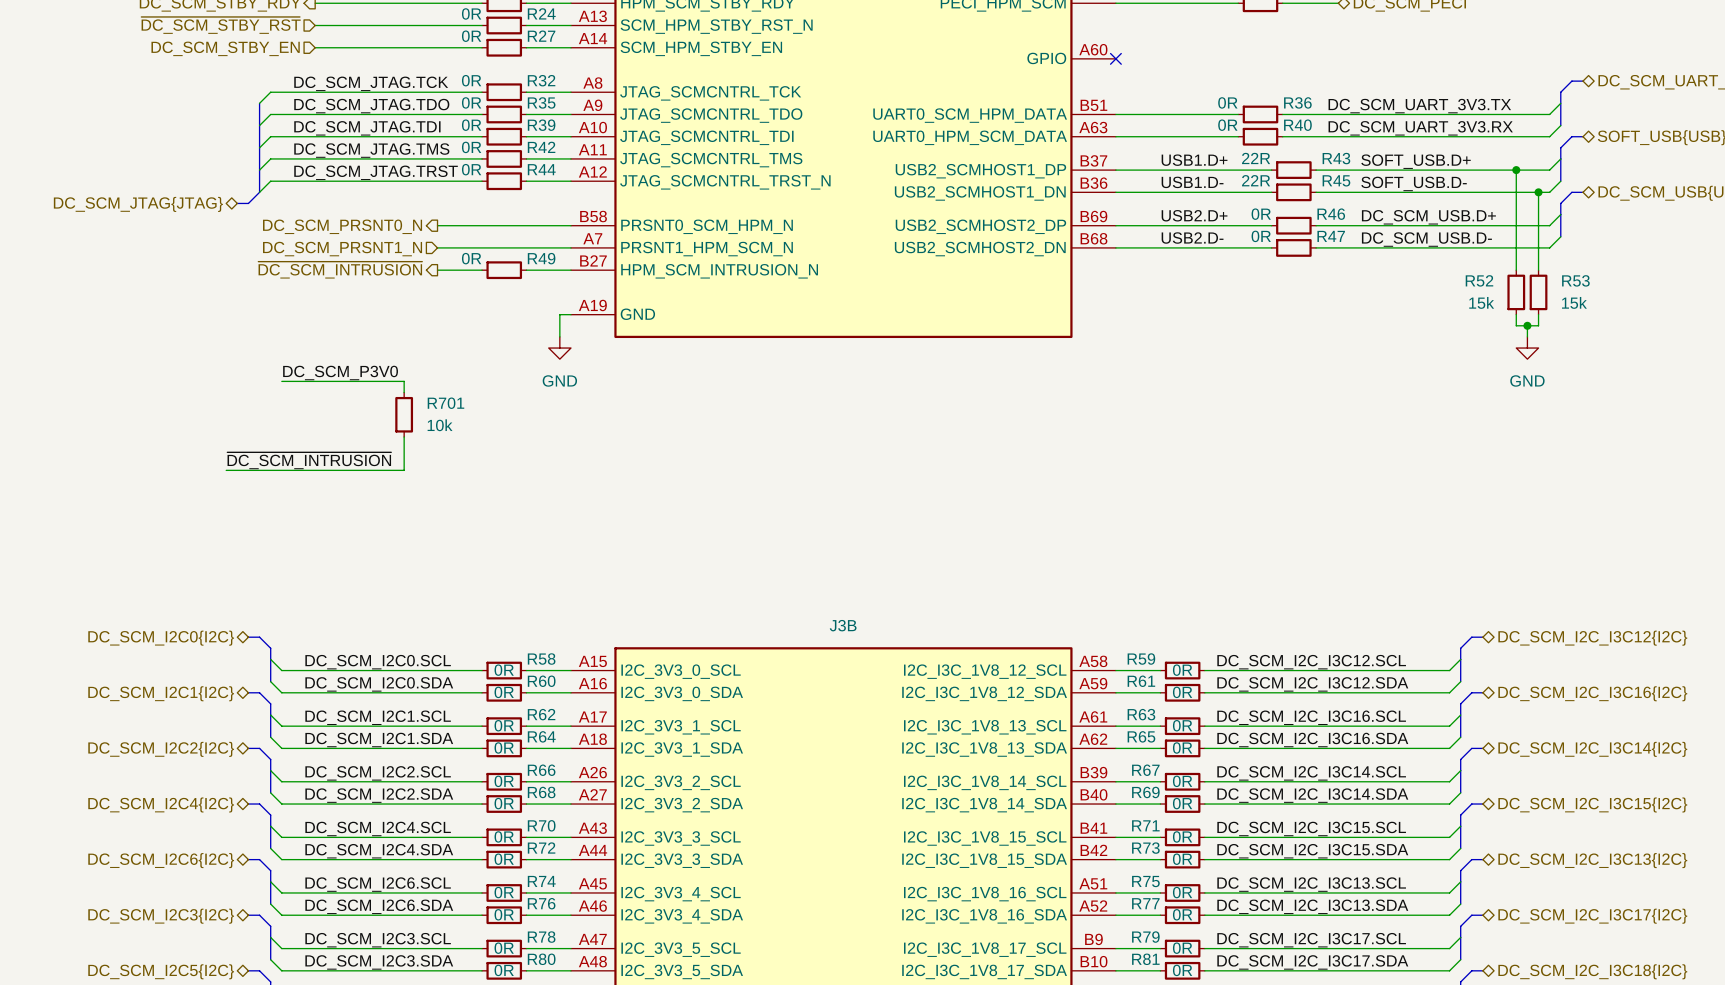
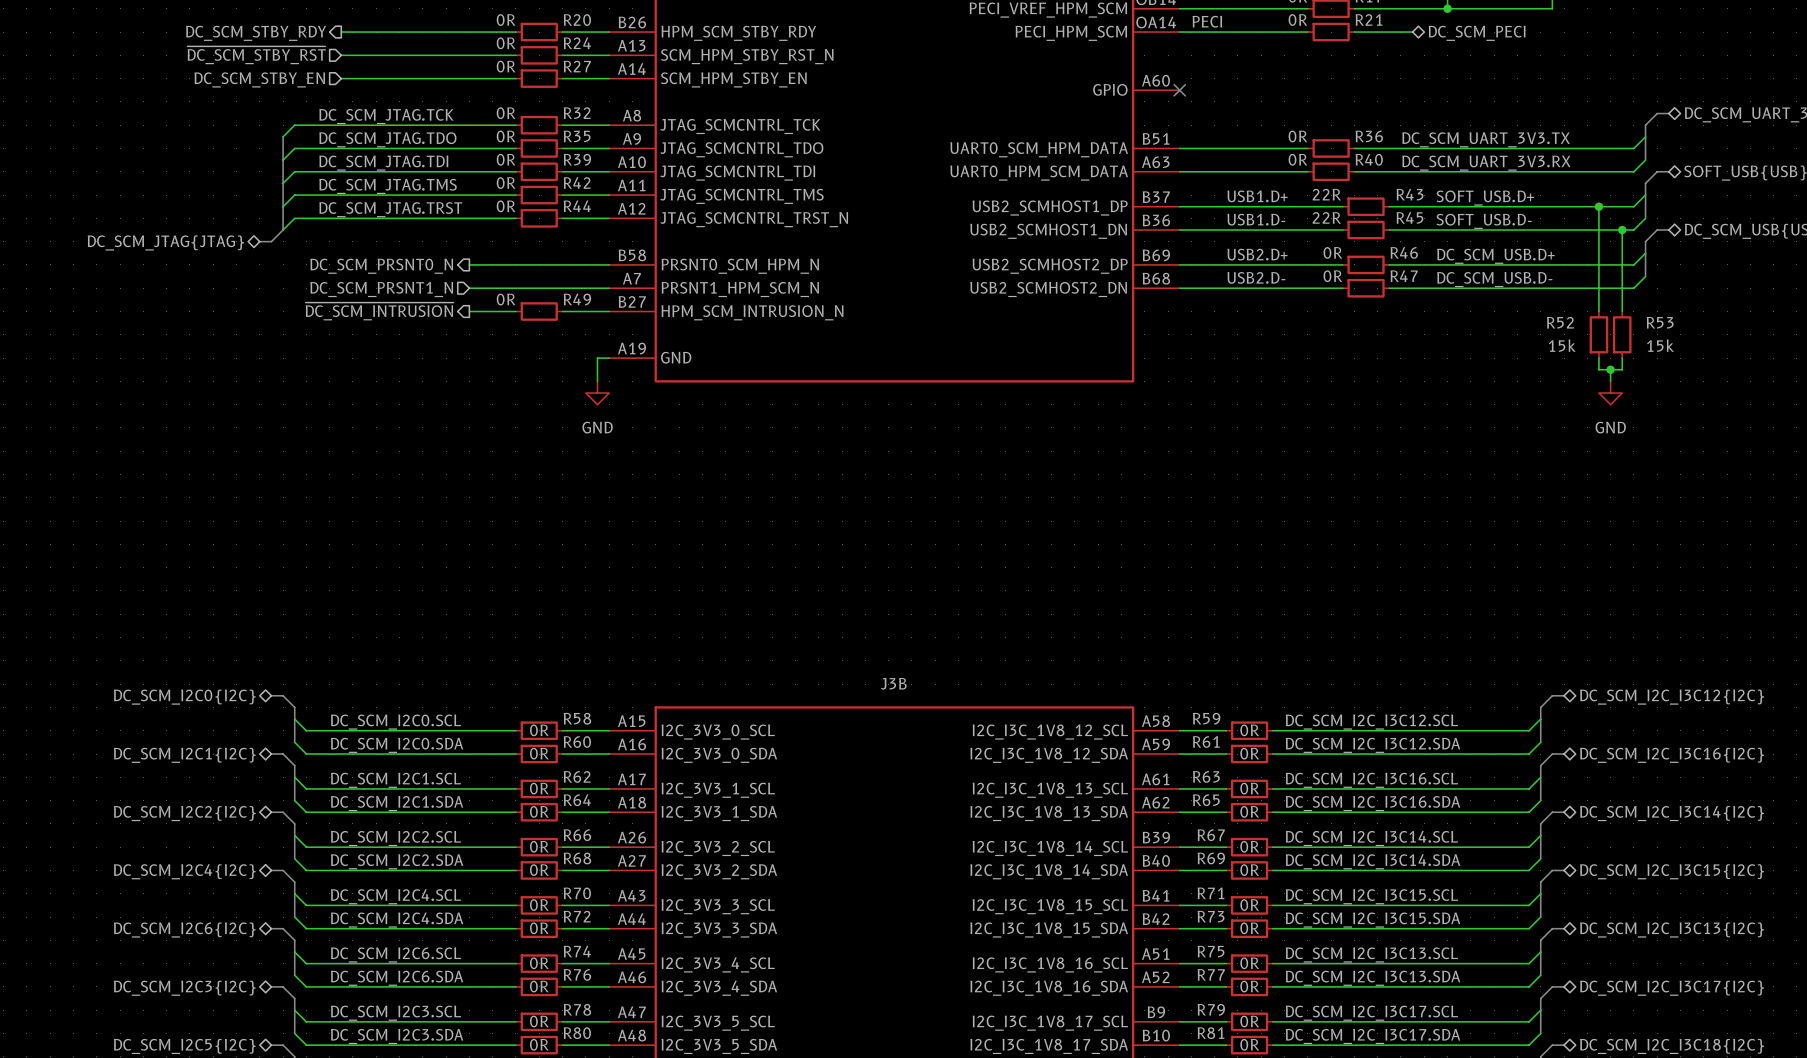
label: DC_SCM_P3V0 (340, 372) -> none
wire: (281, 381) (404, 381) (404, 392) -> none
R701: (404, 414) -> none
wire: (404, 437) (404, 470) (226, 470) -> none
label: ~{DC_SCM_INTRUSION} (309, 460) -> none

